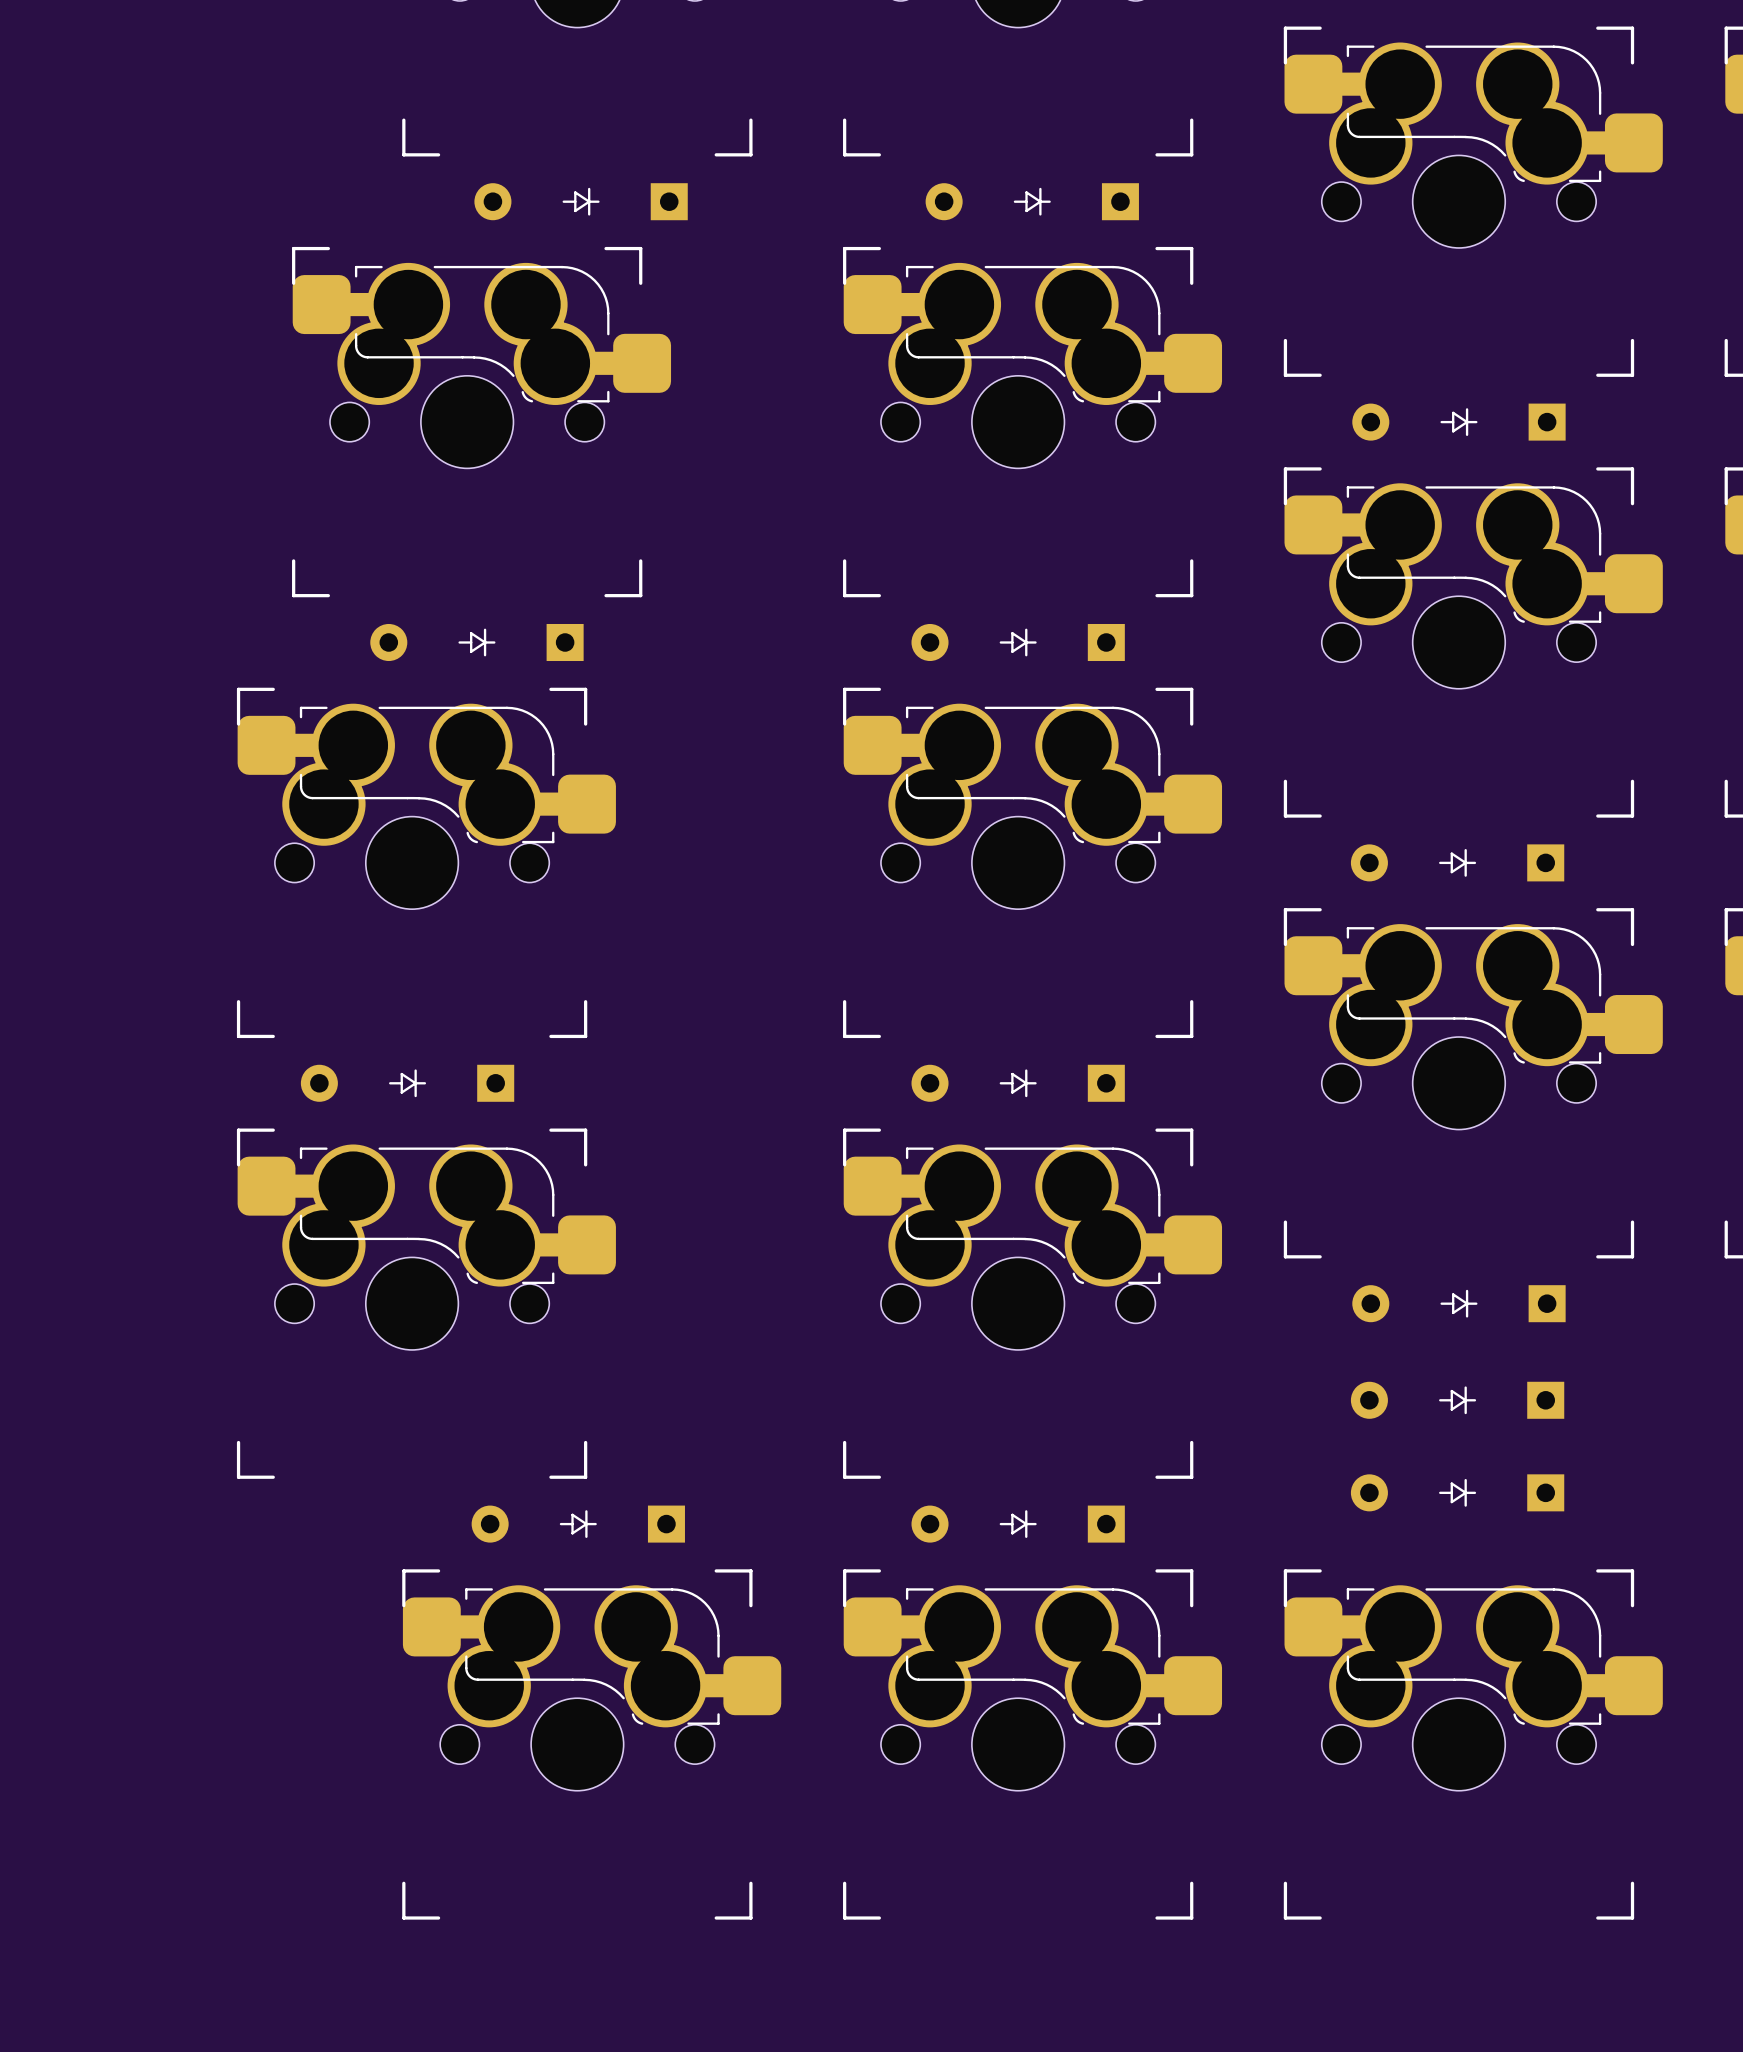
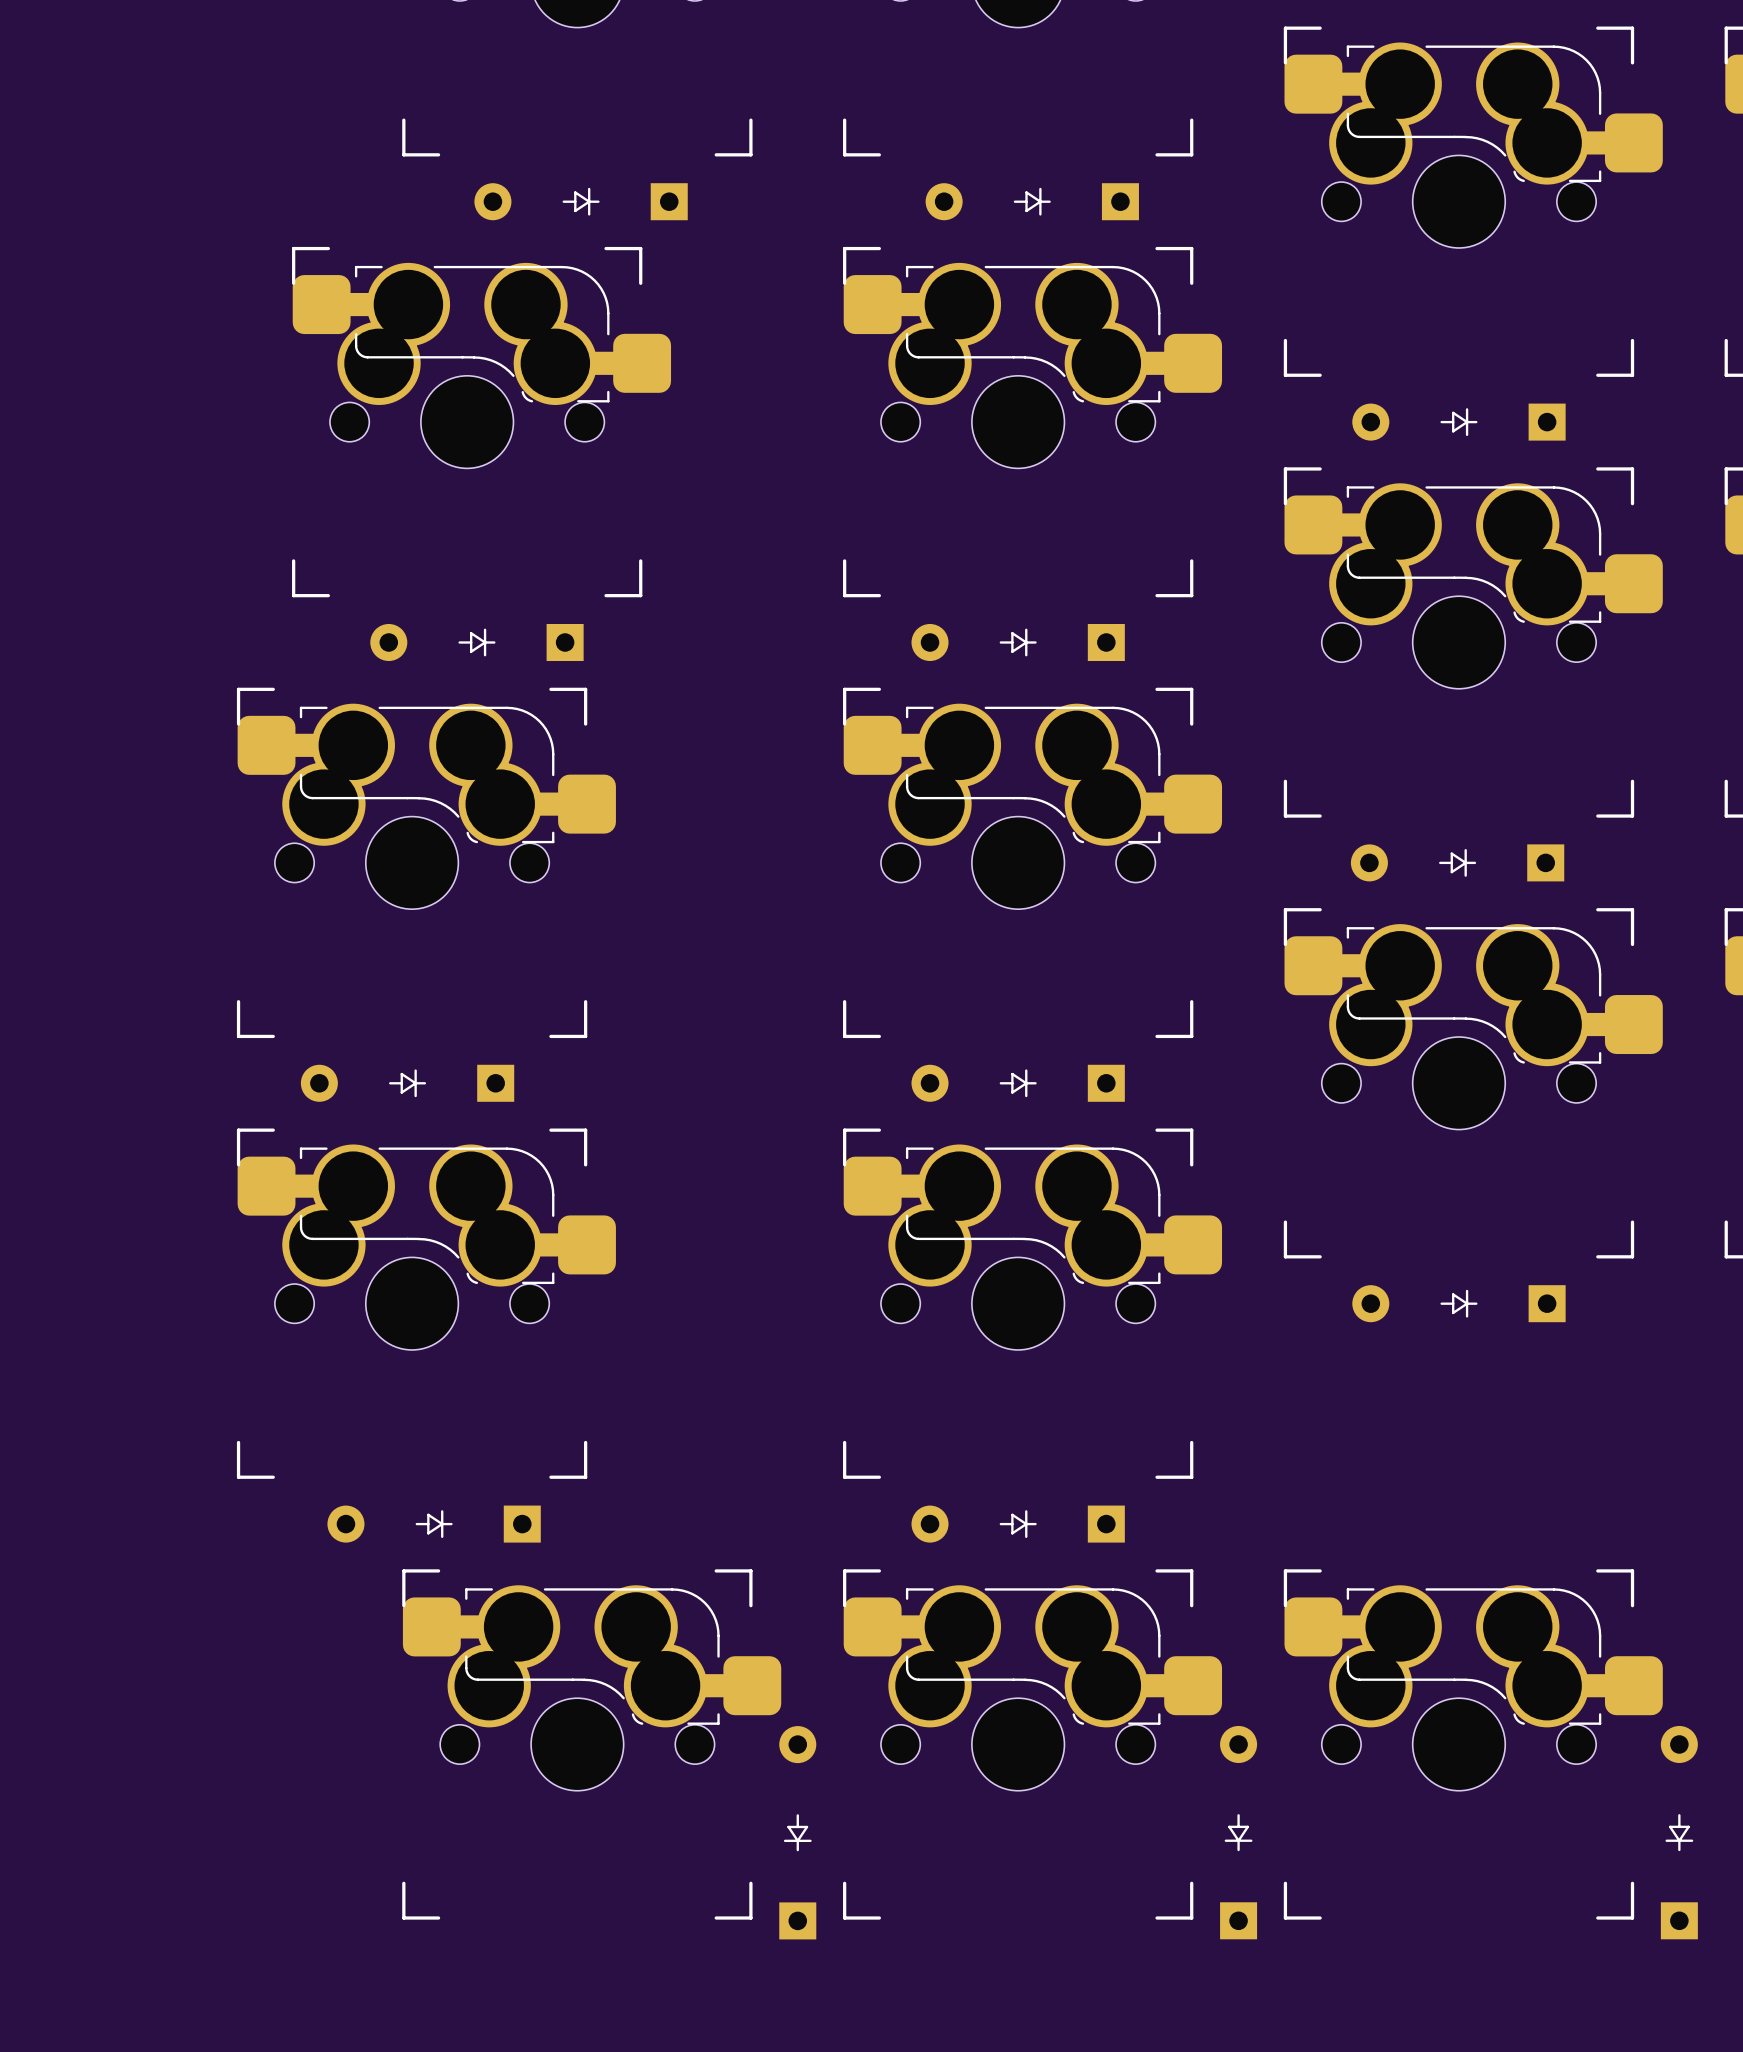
part: (1457, 1400) -> none
part: (1457, 1492) -> none
part position: (578, 1524) -> (434, 1524)
part: none -> (797, 1832)
part: none -> (1238, 1832)
part: none -> (1679, 1832)

